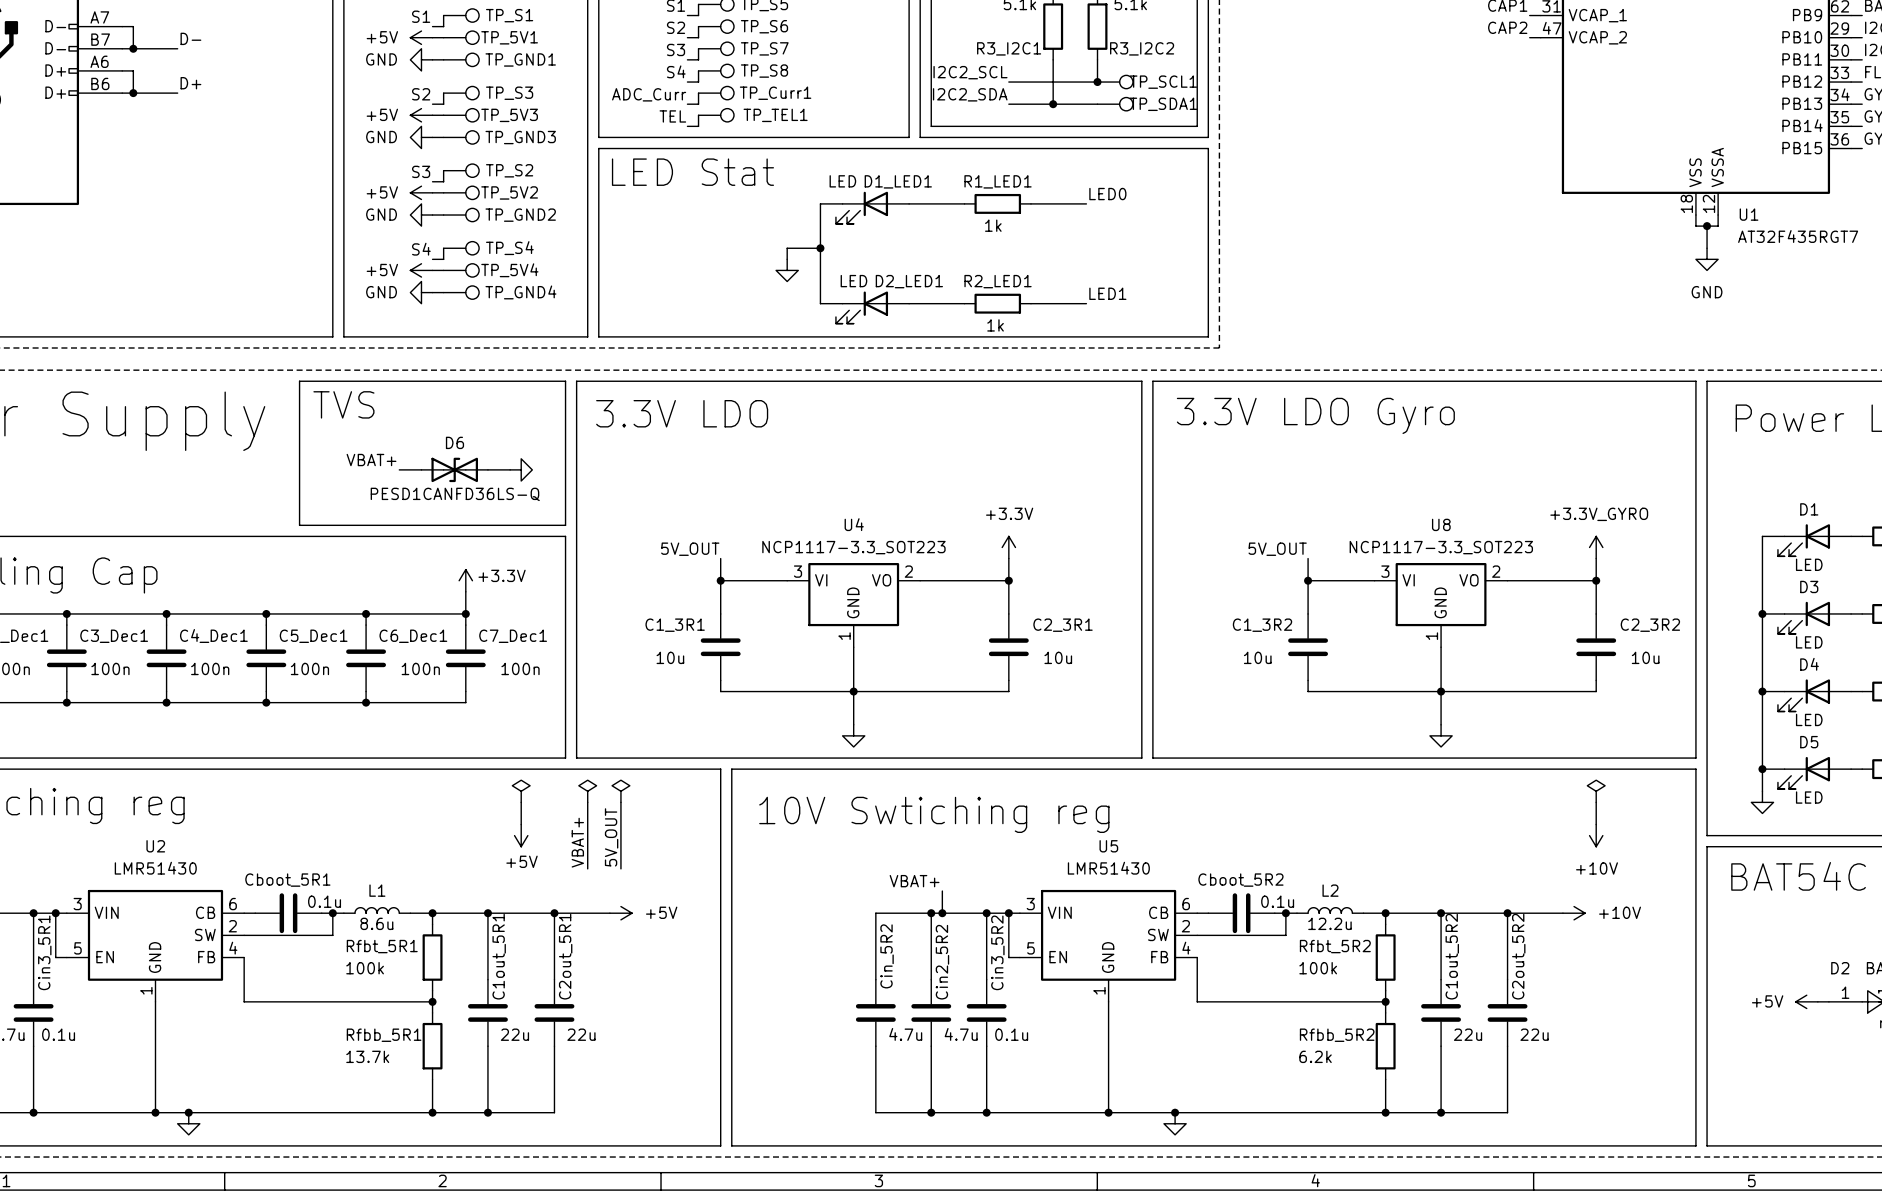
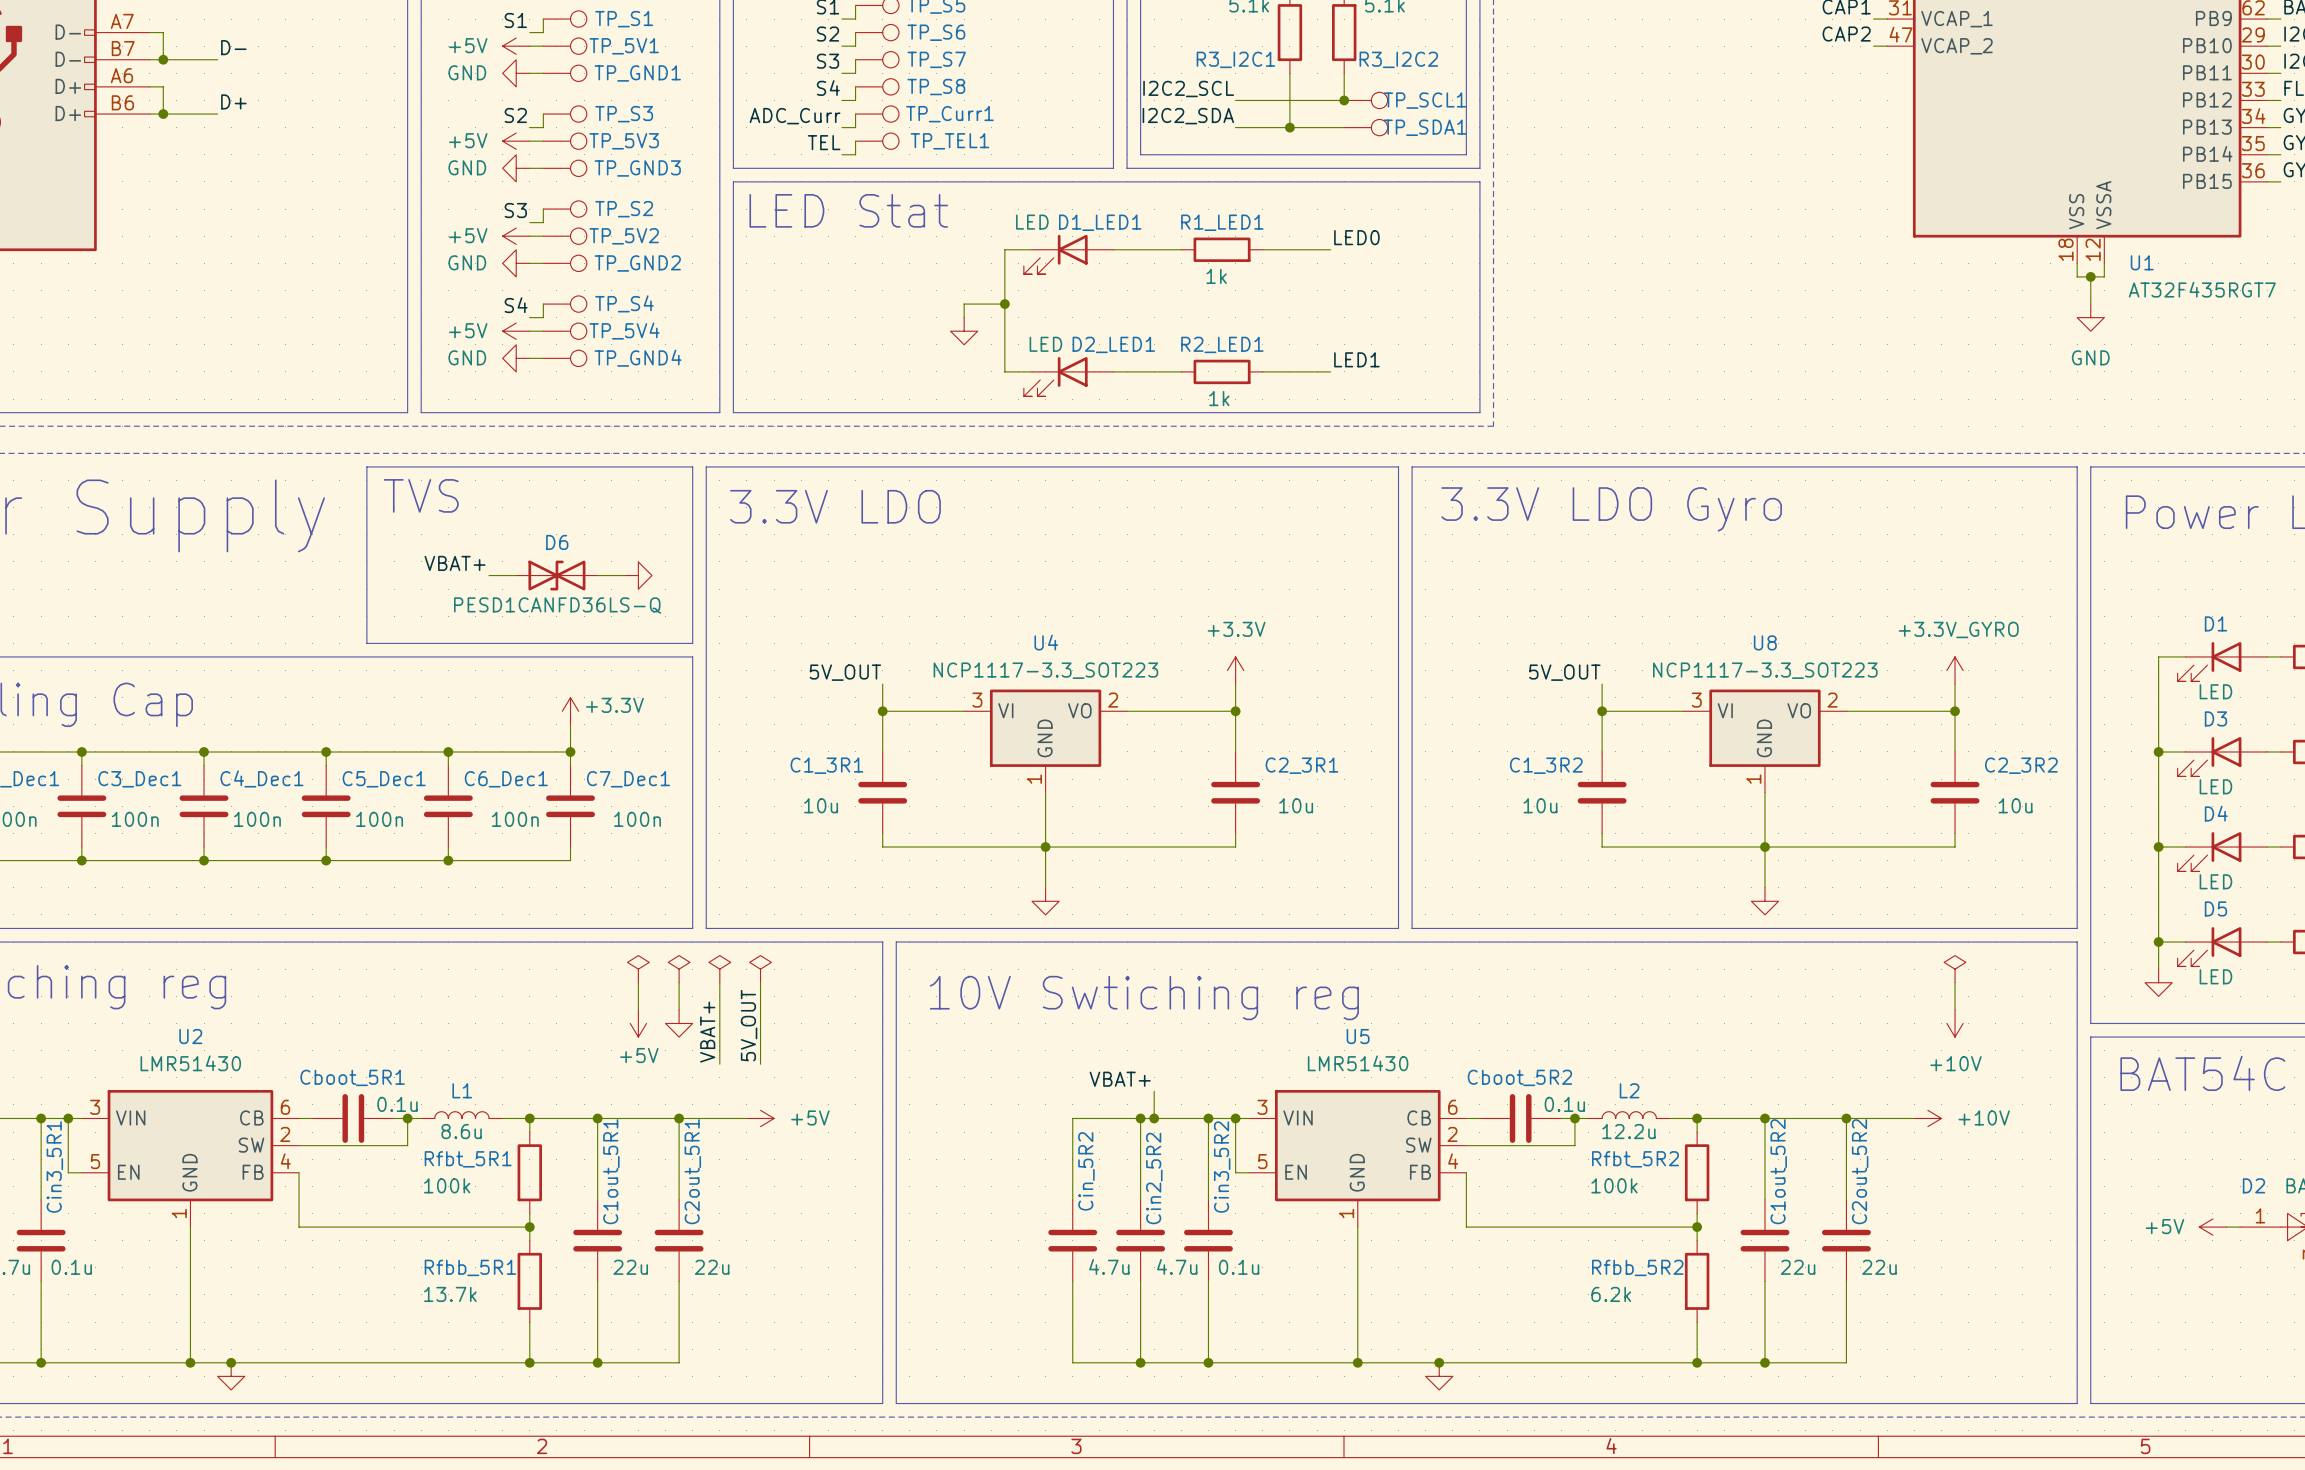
power symbol: none -> (679, 969)
wire: none -> (679, 982) (679, 1009)
power symbol: none -> (679, 1023)

